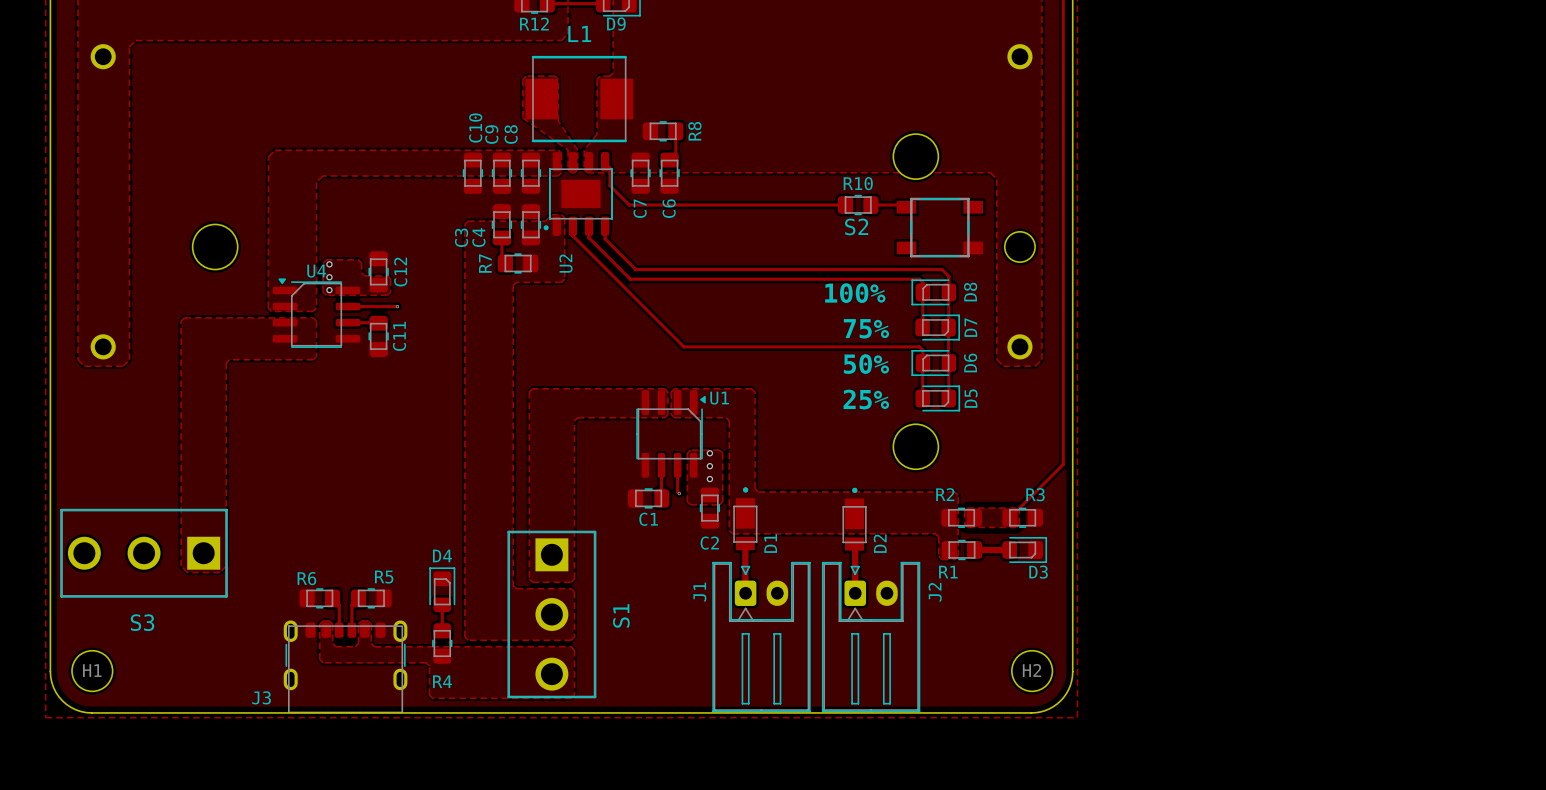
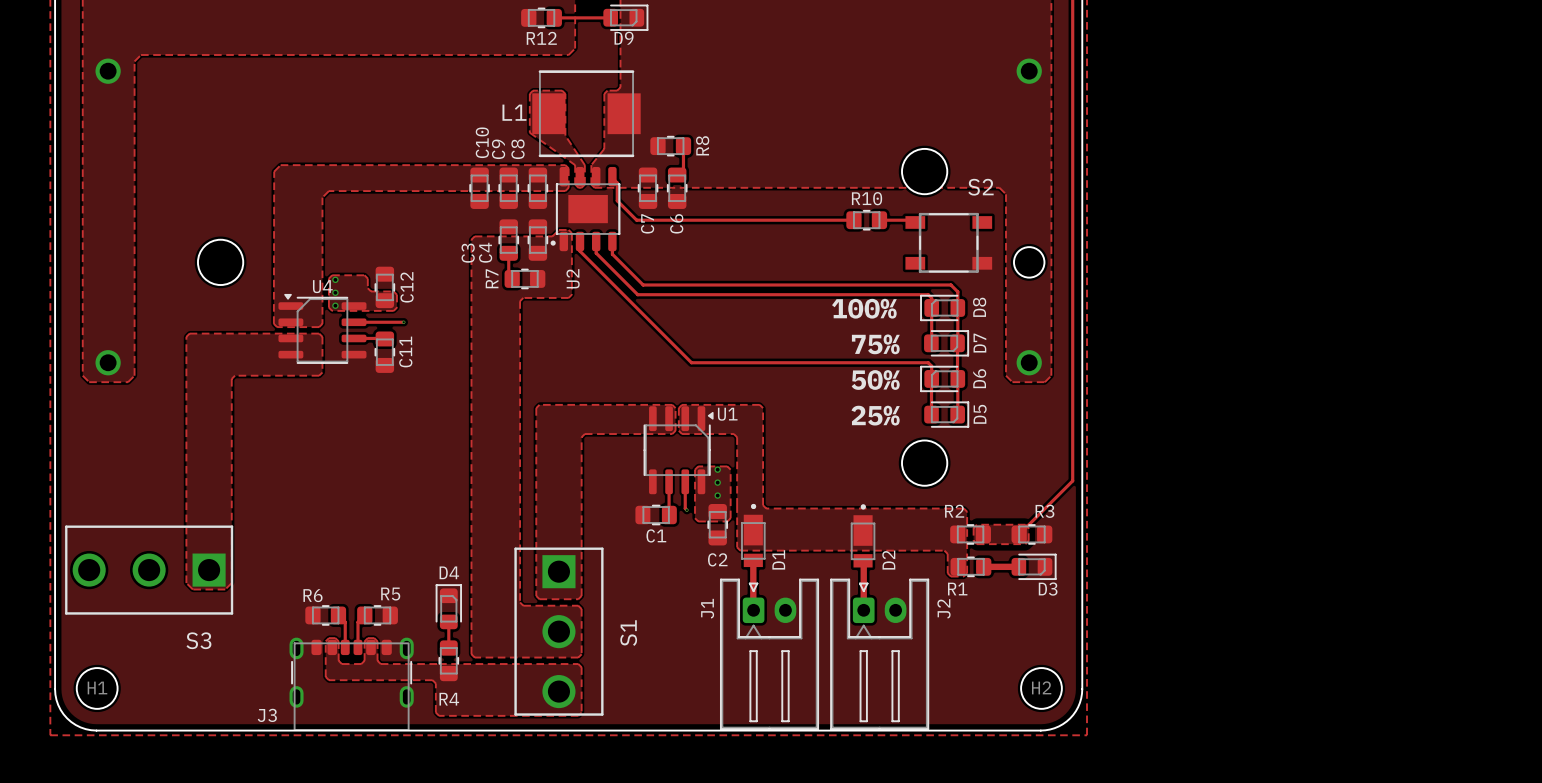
L1 name position: L1 (579, 33) -> L1 (514, 112)
S2 name position: S2 (856, 226) -> S2 (980, 187)
S3 name position: S3 (142, 622) -> S3 (198, 640)

